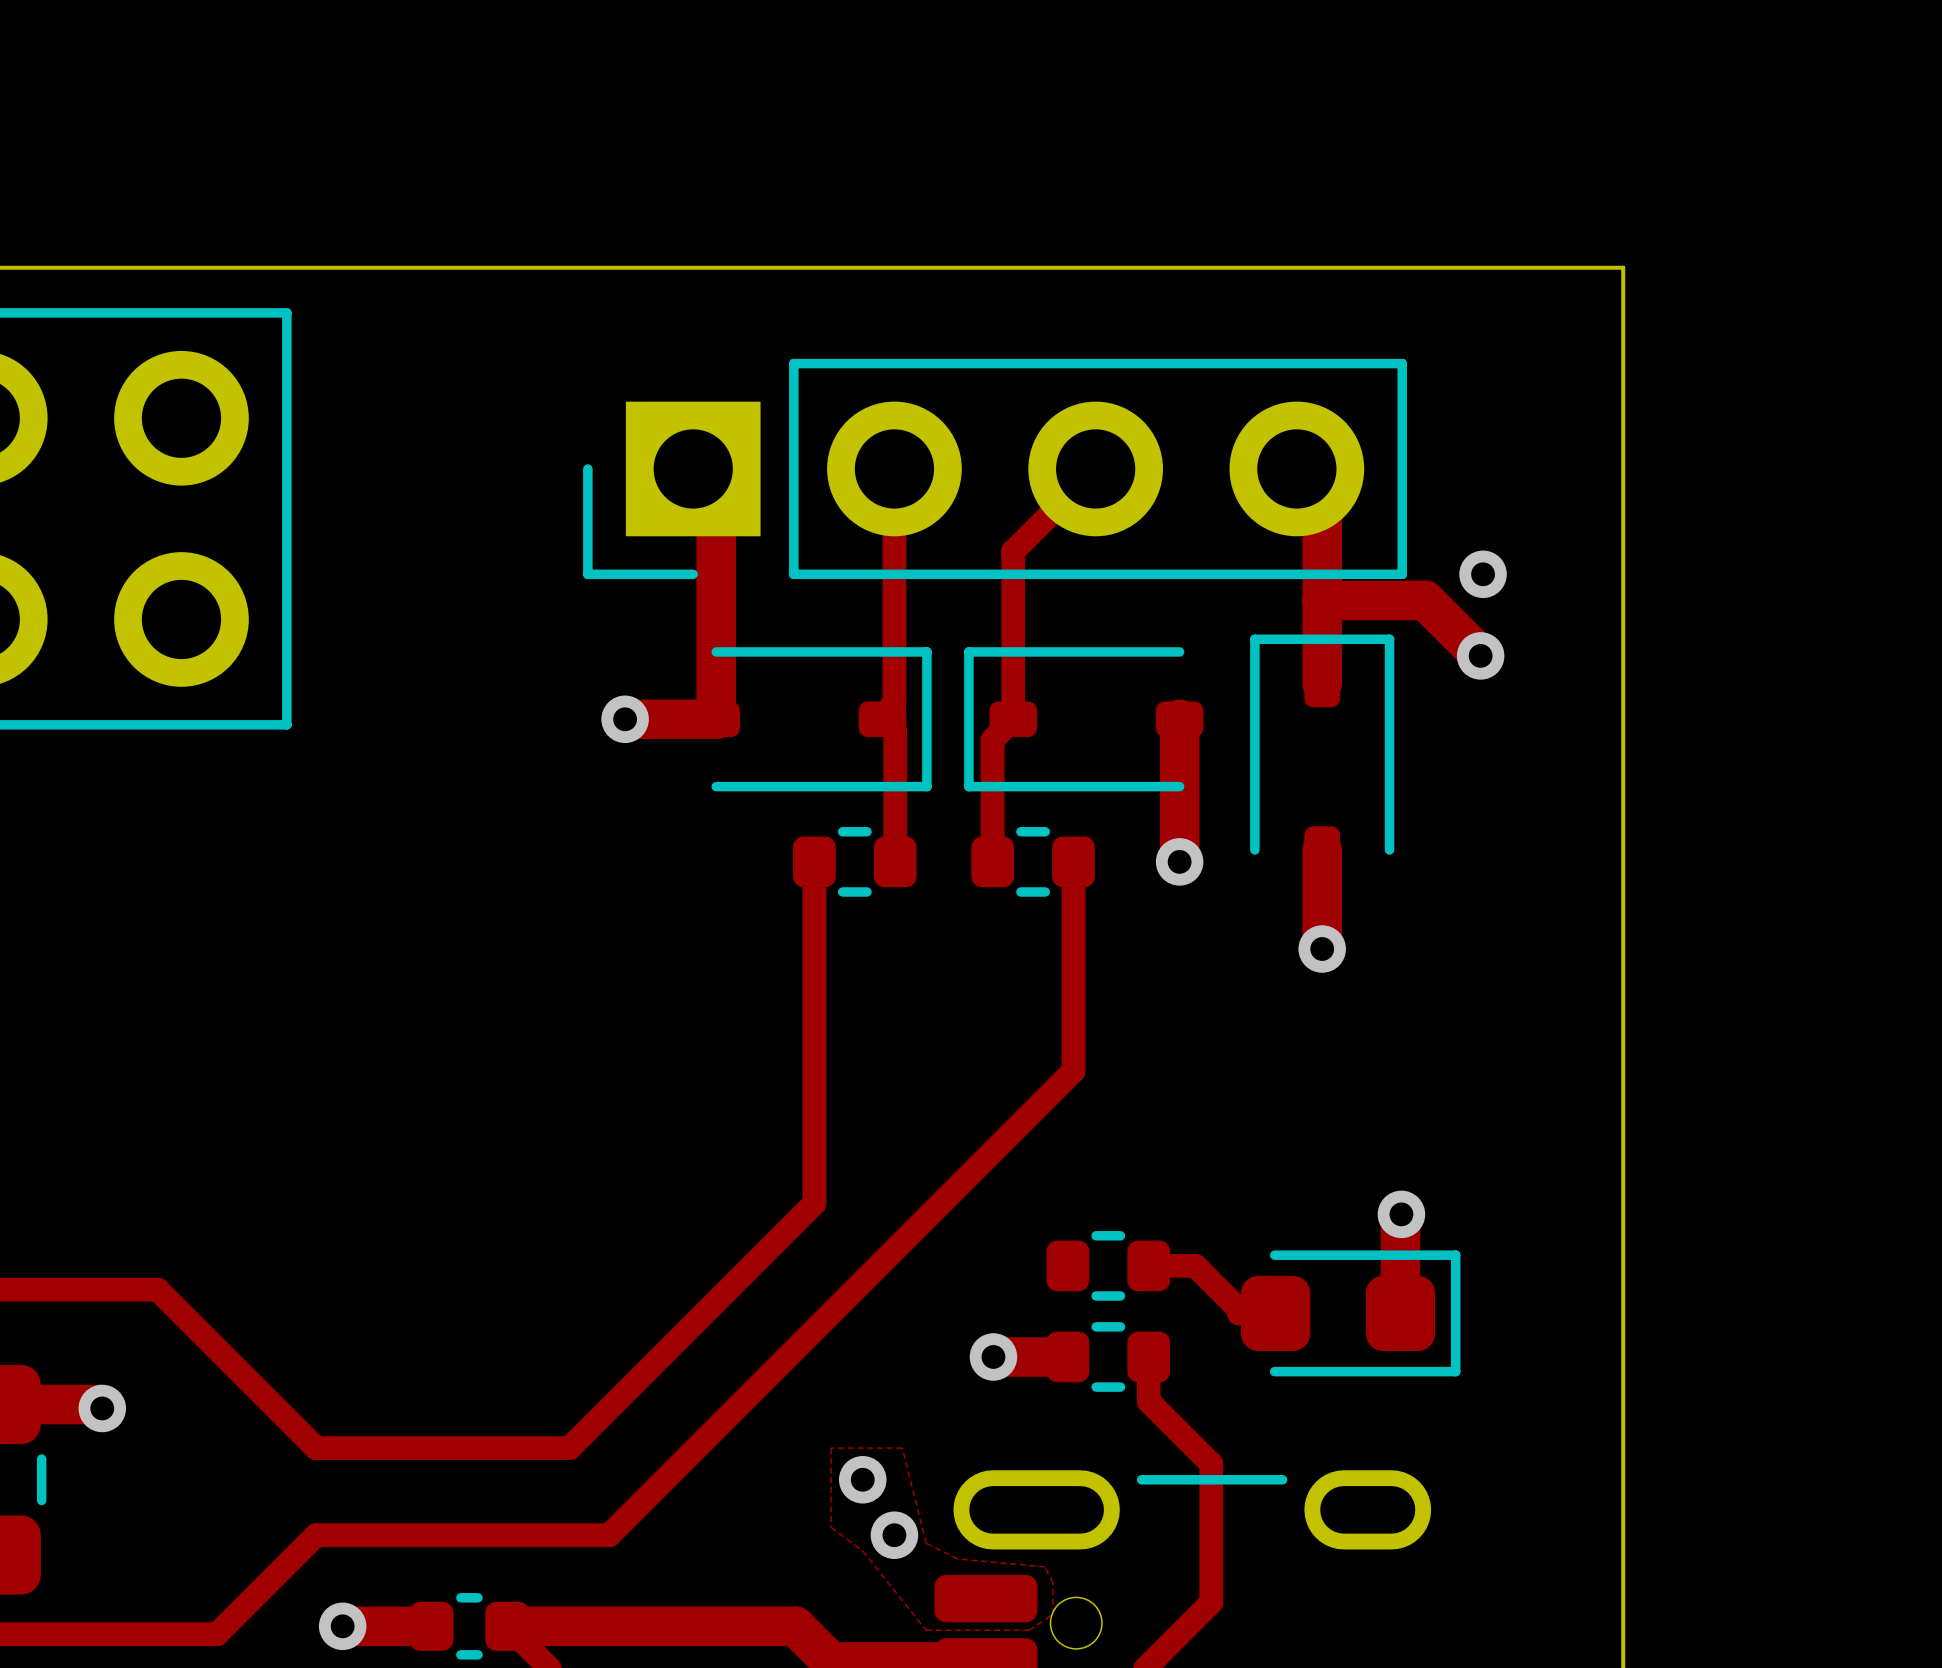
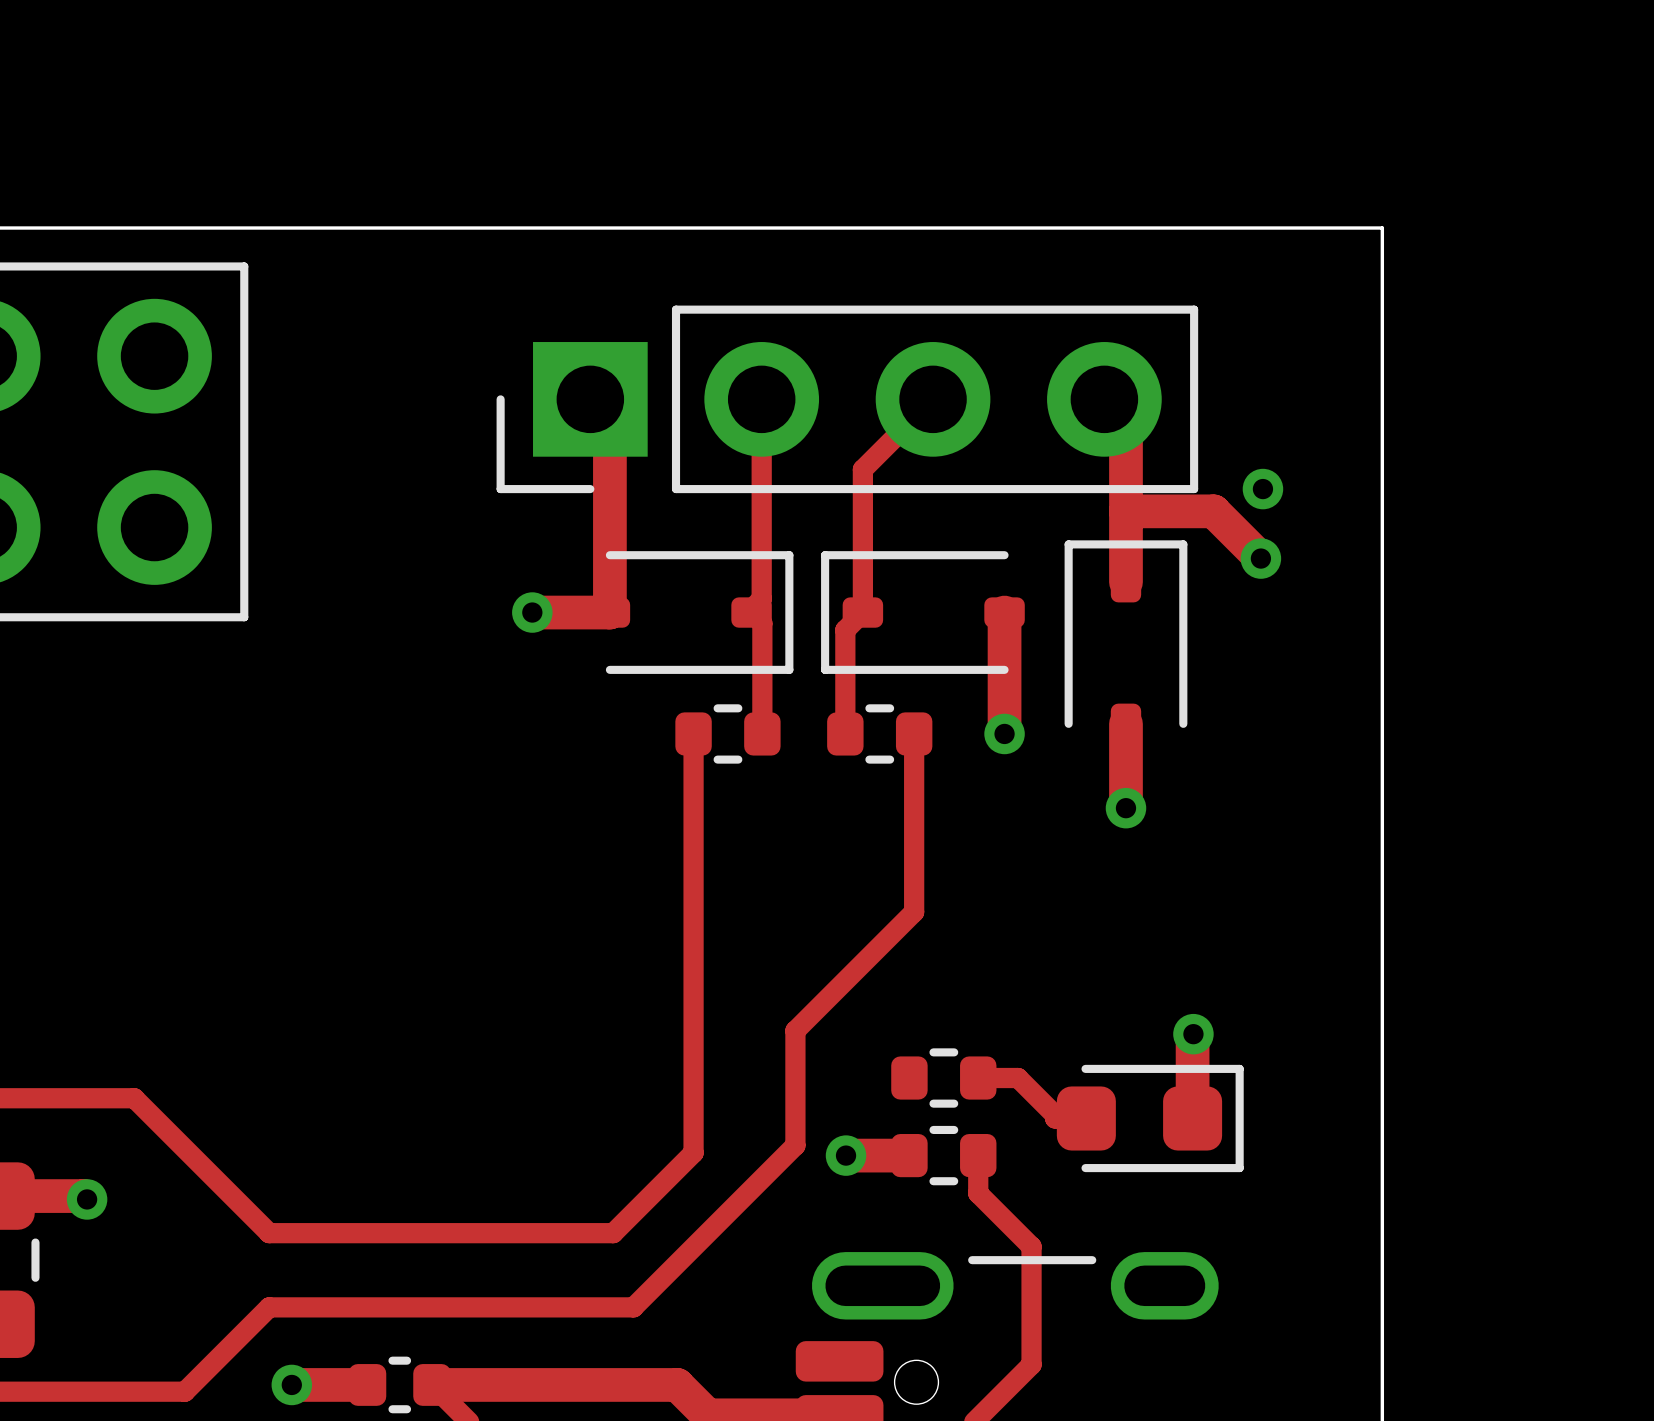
track: (814, 1203) (569, 1448) -> (693, 1024) (693, 1152) (613, 1233) (485, 1233)
track: (934, 1210) (609, 1535) -> (795, 1030) (795, 1145) (633, 1307) (518, 1307)
zone outline: (831, 1448) (902, 1448) (926, 1543) (957, 1558) (1044, 1566) (1052, 1582) (1052, 1614) (1029, 1630) (926, 1630) (862, 1551) (831, 1527) (831, 1448) -> none
via: (862, 1479) -> none
via: (894, 1535) -> none

